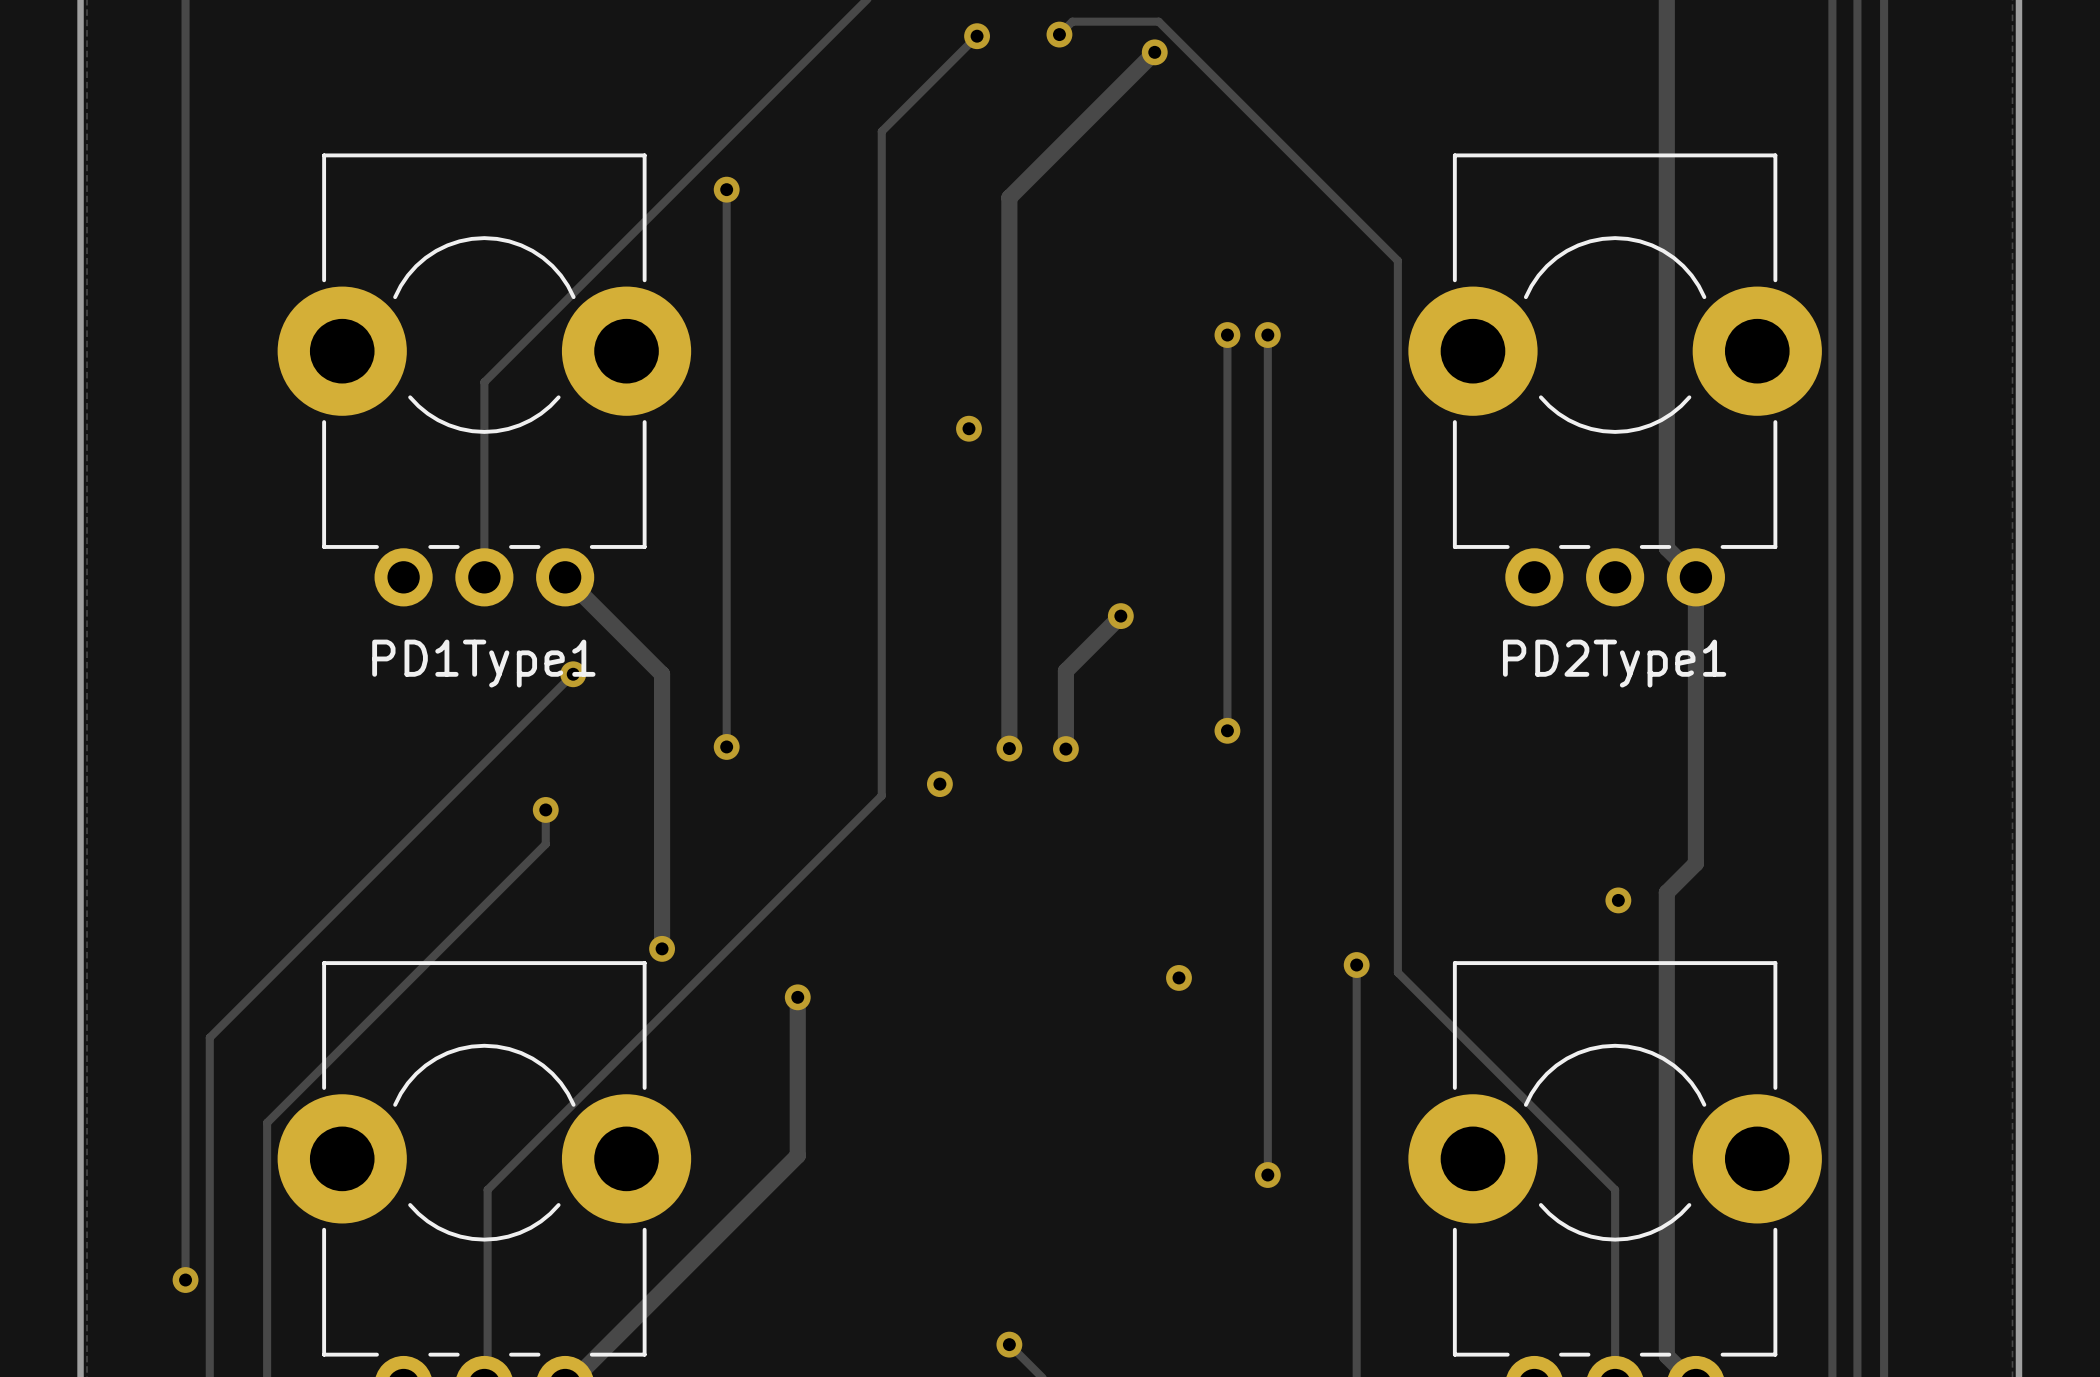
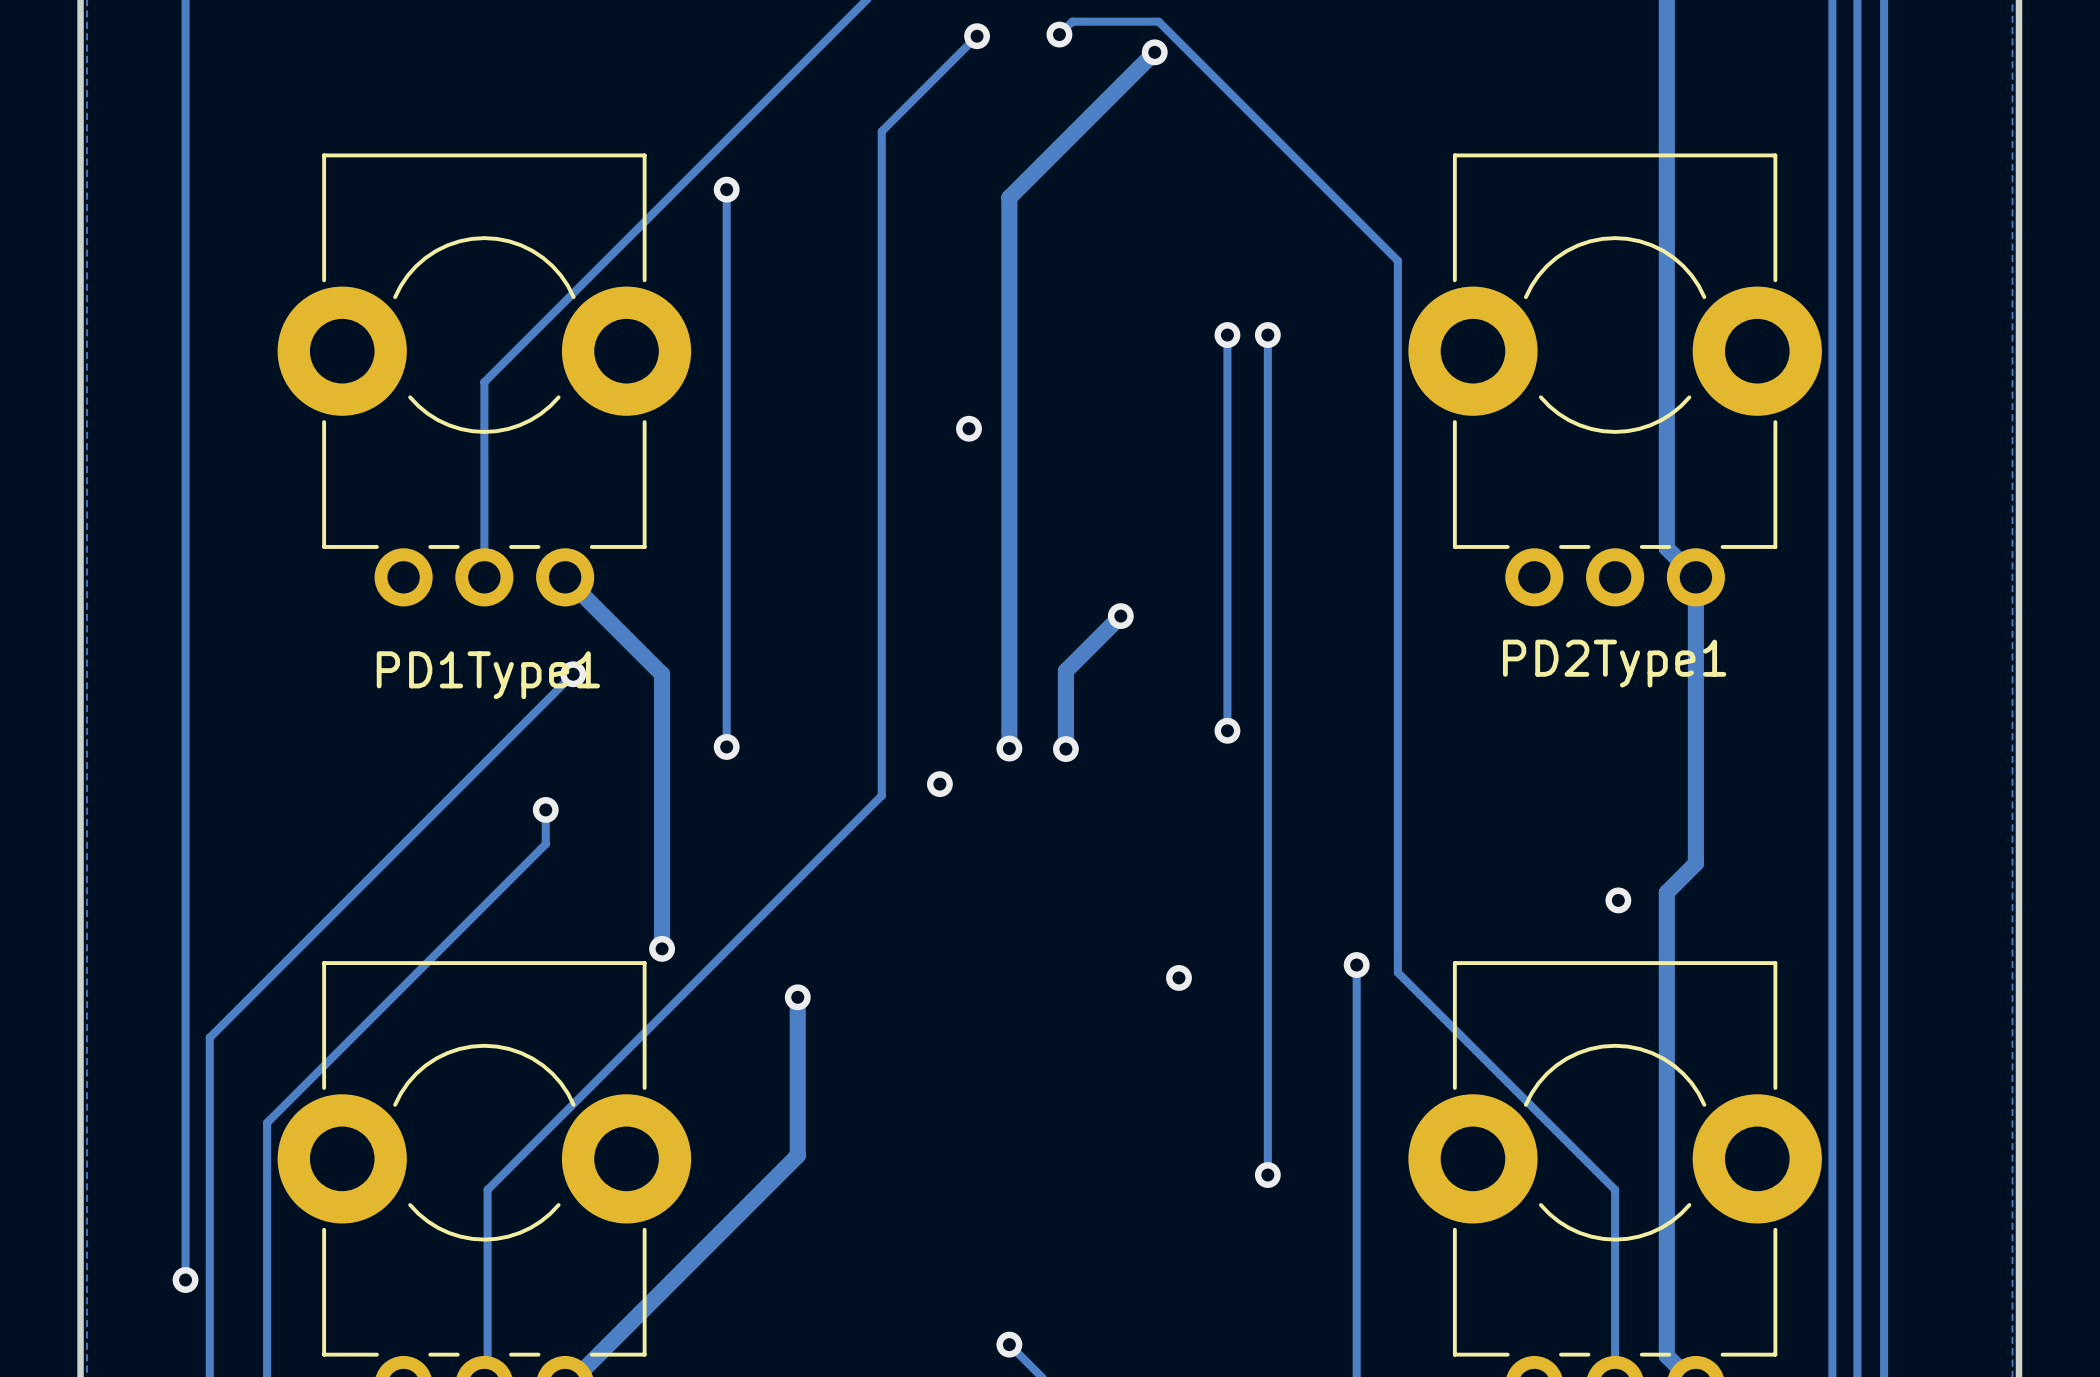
PD1Type1 name position: PD1Type1 (483, 663) -> PD1Type1 (488, 675)

